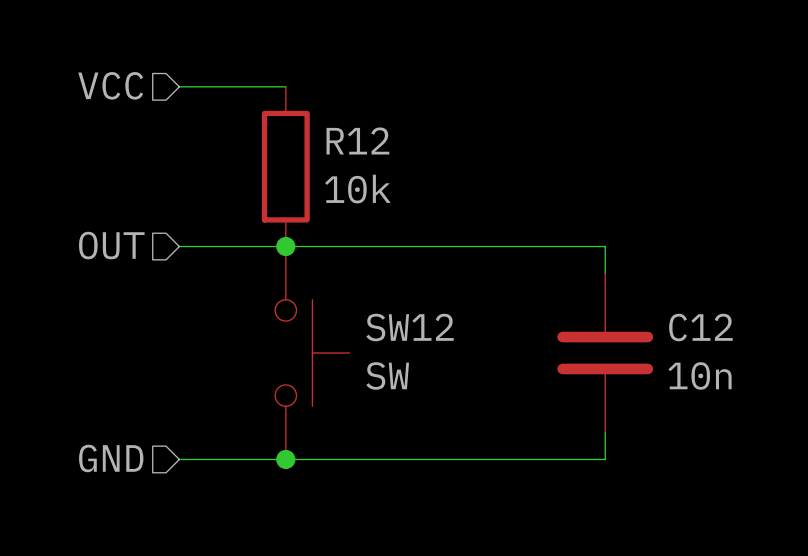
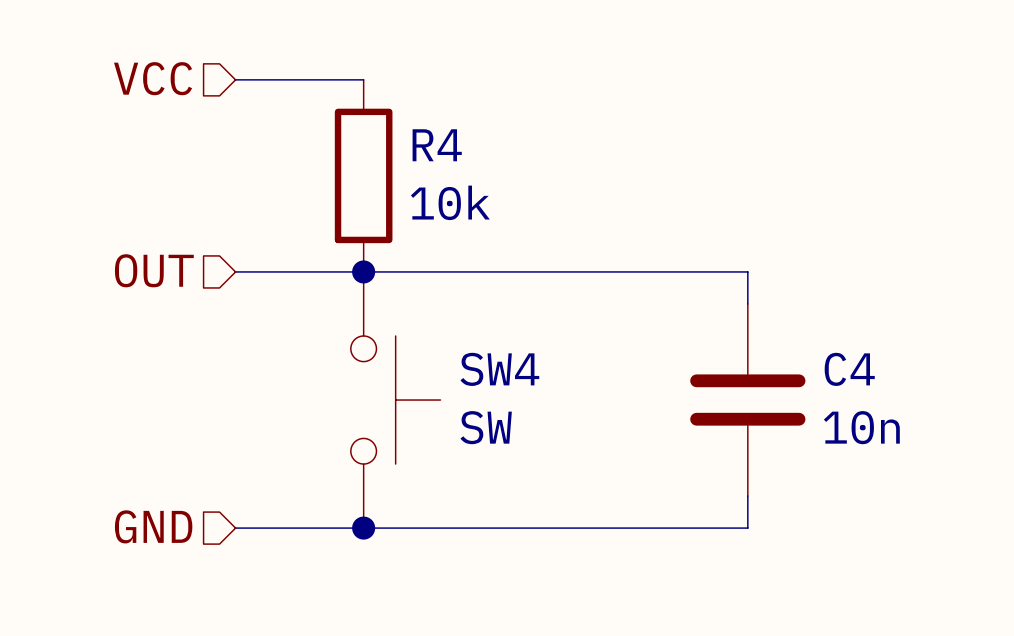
R12 name: R12 (357, 140) -> R4 (437, 145)
SW12 name: SW12 (410, 327) -> SW4 (499, 369)
C12 name: C12 (700, 327) -> C4 (849, 369)

